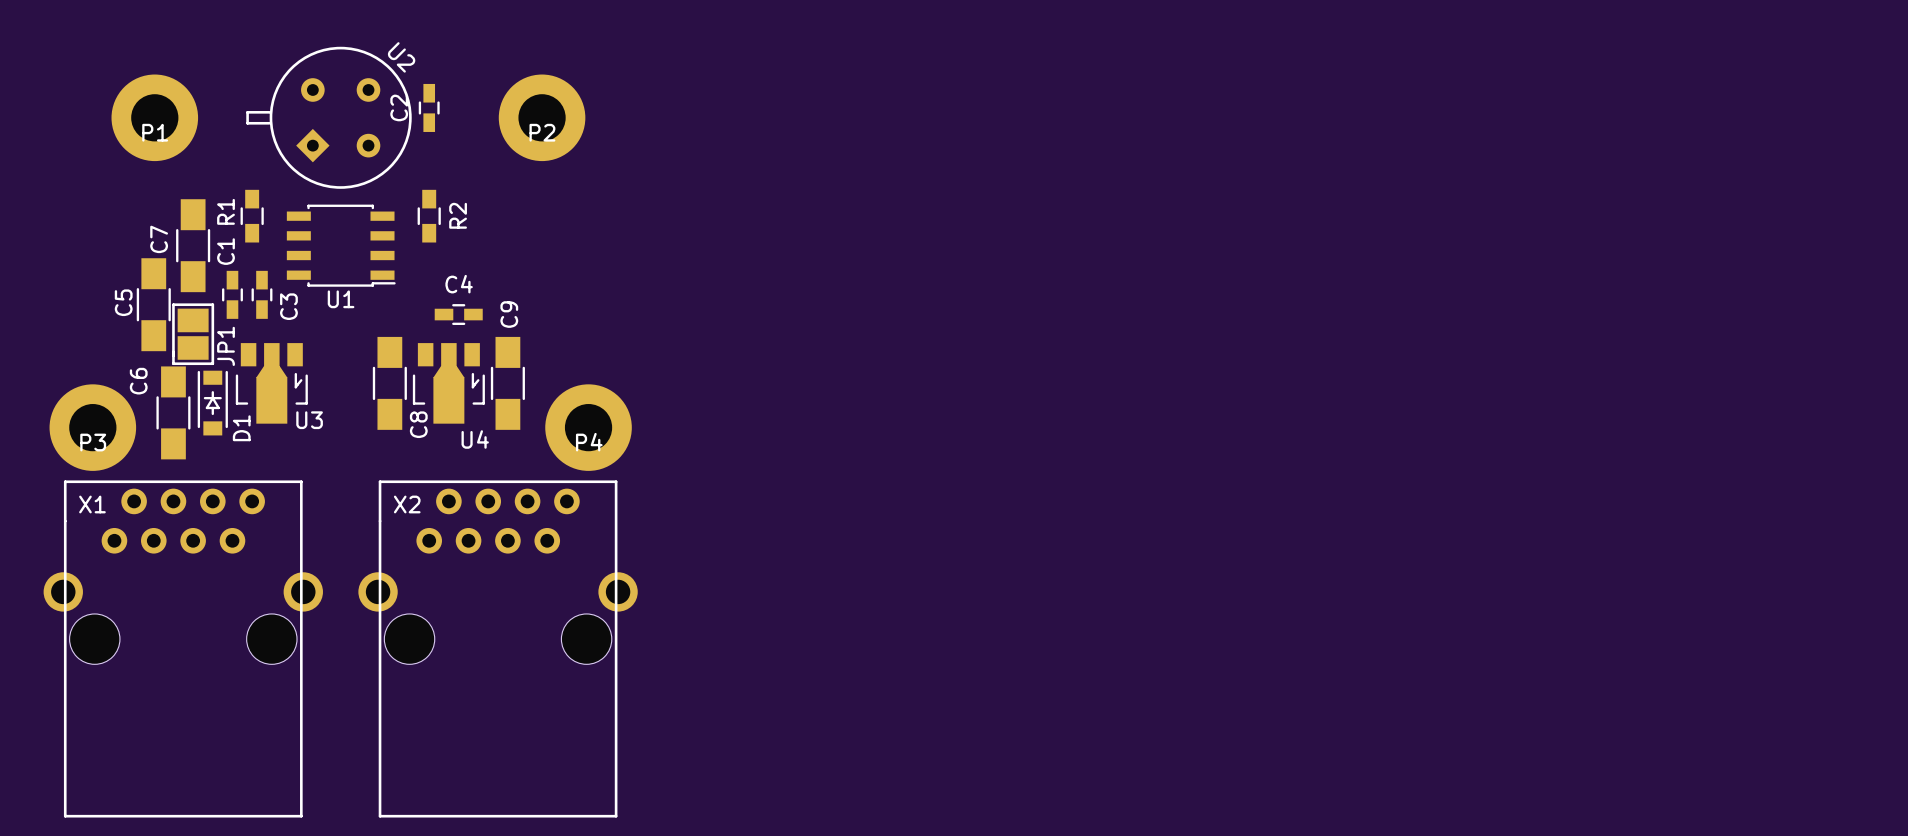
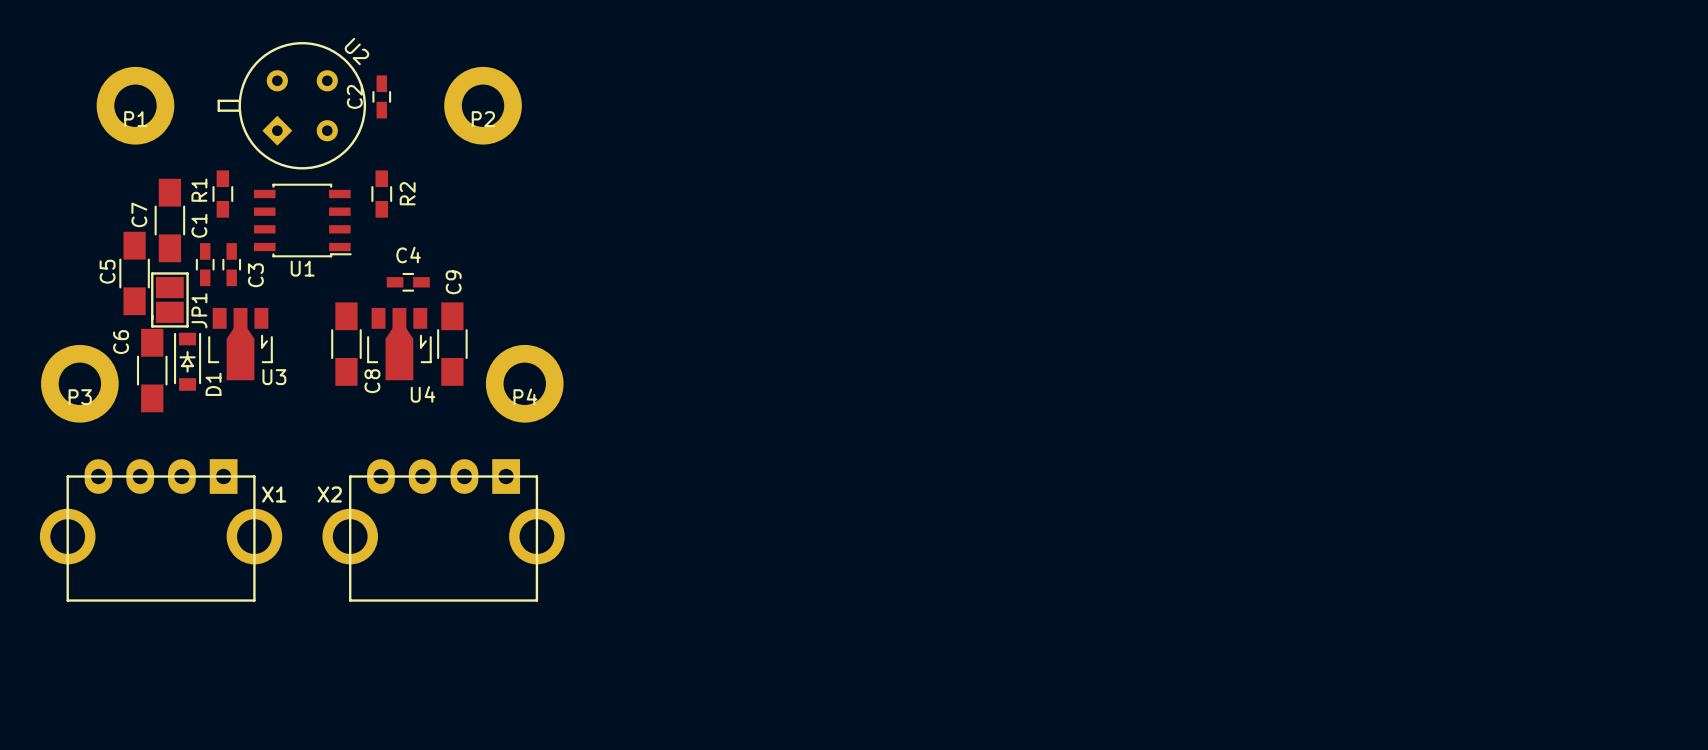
X1 footprint: [43, 480, 323, 818] -> [39, 459, 283, 602]
X2 footprint: [358, 480, 638, 818] -> [322, 459, 565, 602]
X1 name position: X1 (92, 504) -> X1 (274, 494)
X2 name position: X2 (407, 504) -> X2 (329, 494)

